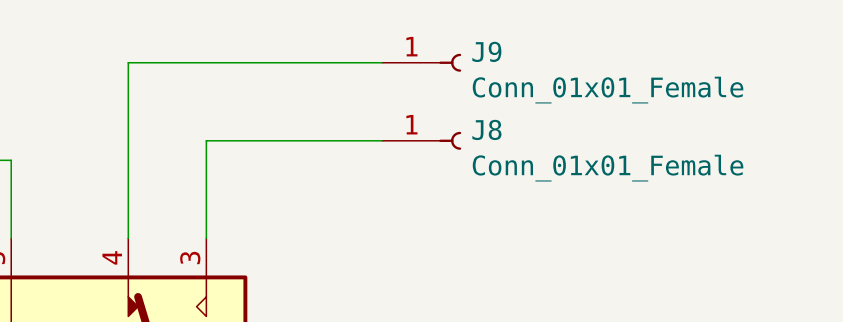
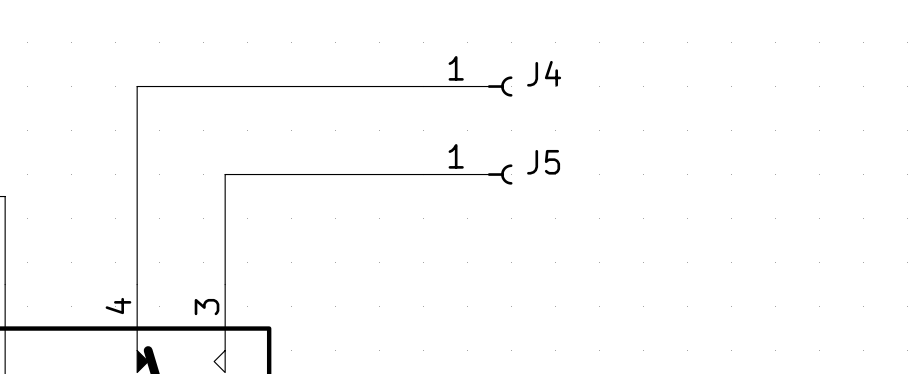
J9 name: J9 (486, 51) -> J4 (544, 73)
J9 value: Conn_01x01_Female (608, 90) -> none
J8 name: J8 (486, 129) -> J5 (543, 162)
J8 value: Conn_01x01_Female (608, 168) -> none

